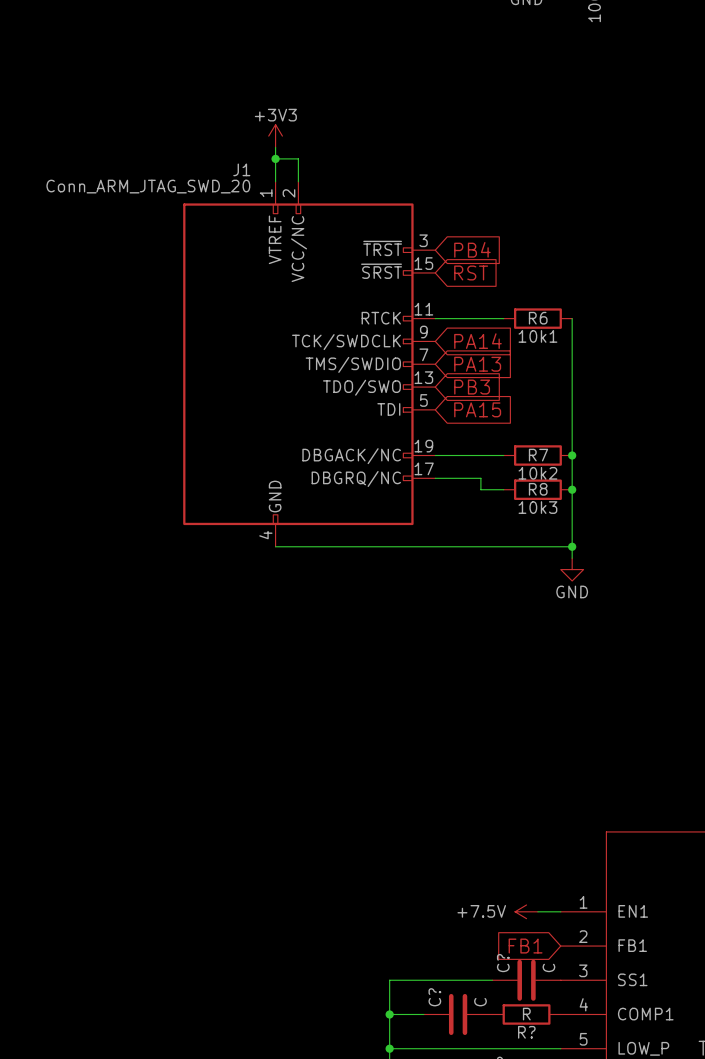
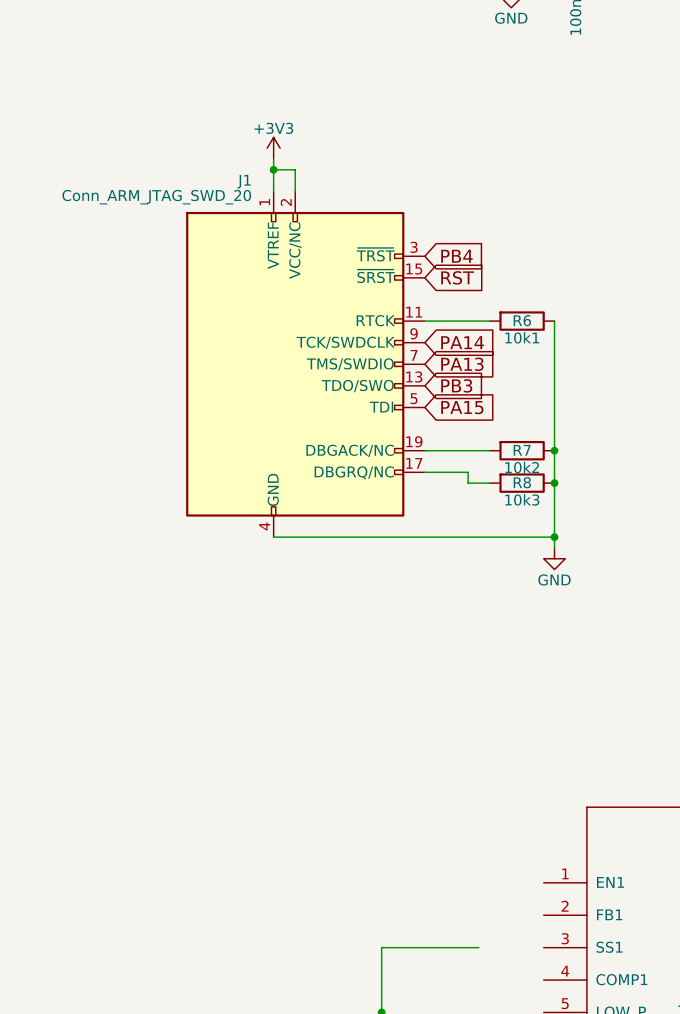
power symbol: +7.5V (526, 911) -> none
wire: (537, 911) (560, 911) -> none
global label: FB1 (525, 946) -> none
C?: C (526, 980) -> none
wire: (389, 1014) (423, 1014) -> none
junction: (389, 1014) -> none
C?: C (458, 1014) -> none
R?: R (526, 1014) -> none
wire: (389, 1048) (560, 1048) -> none

